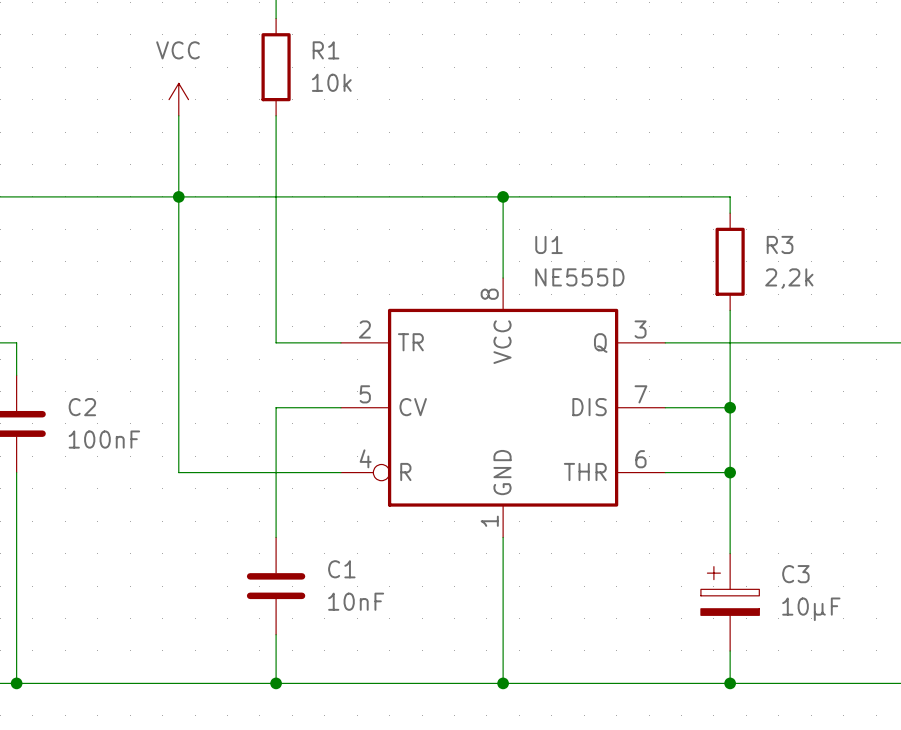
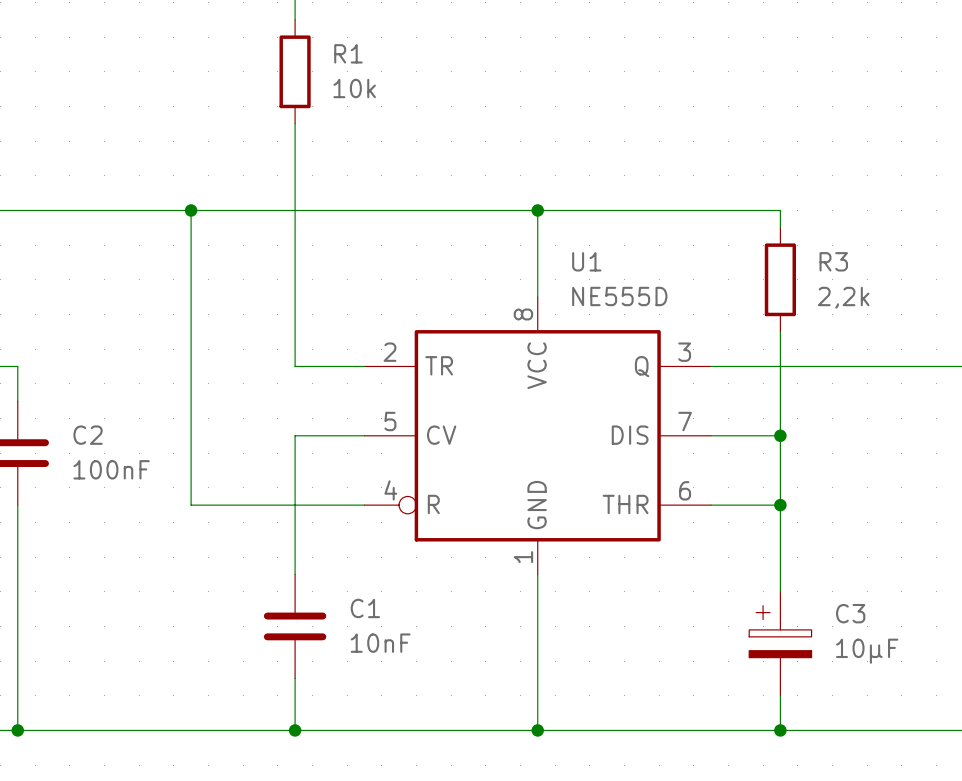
power symbol: VCC (178, 99) -> none
wire: (178, 115) (178, 196) -> none

